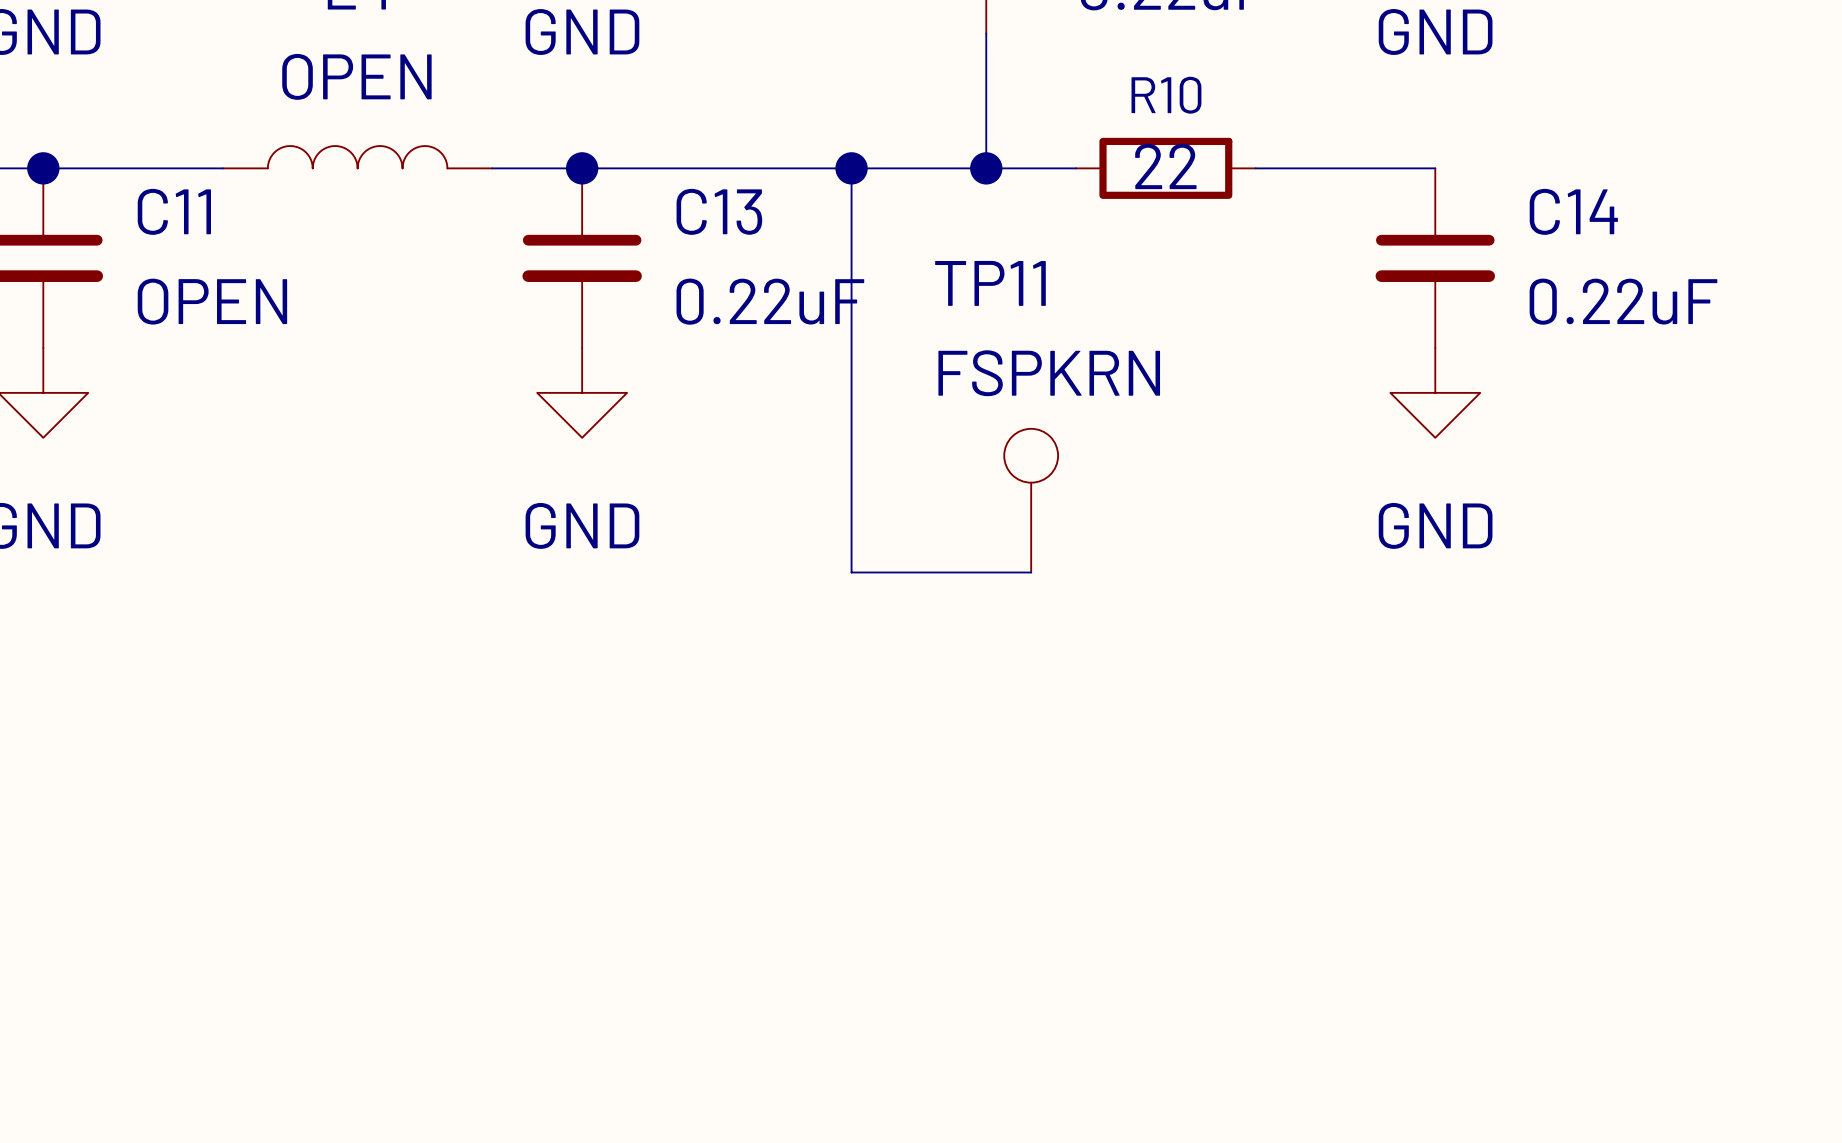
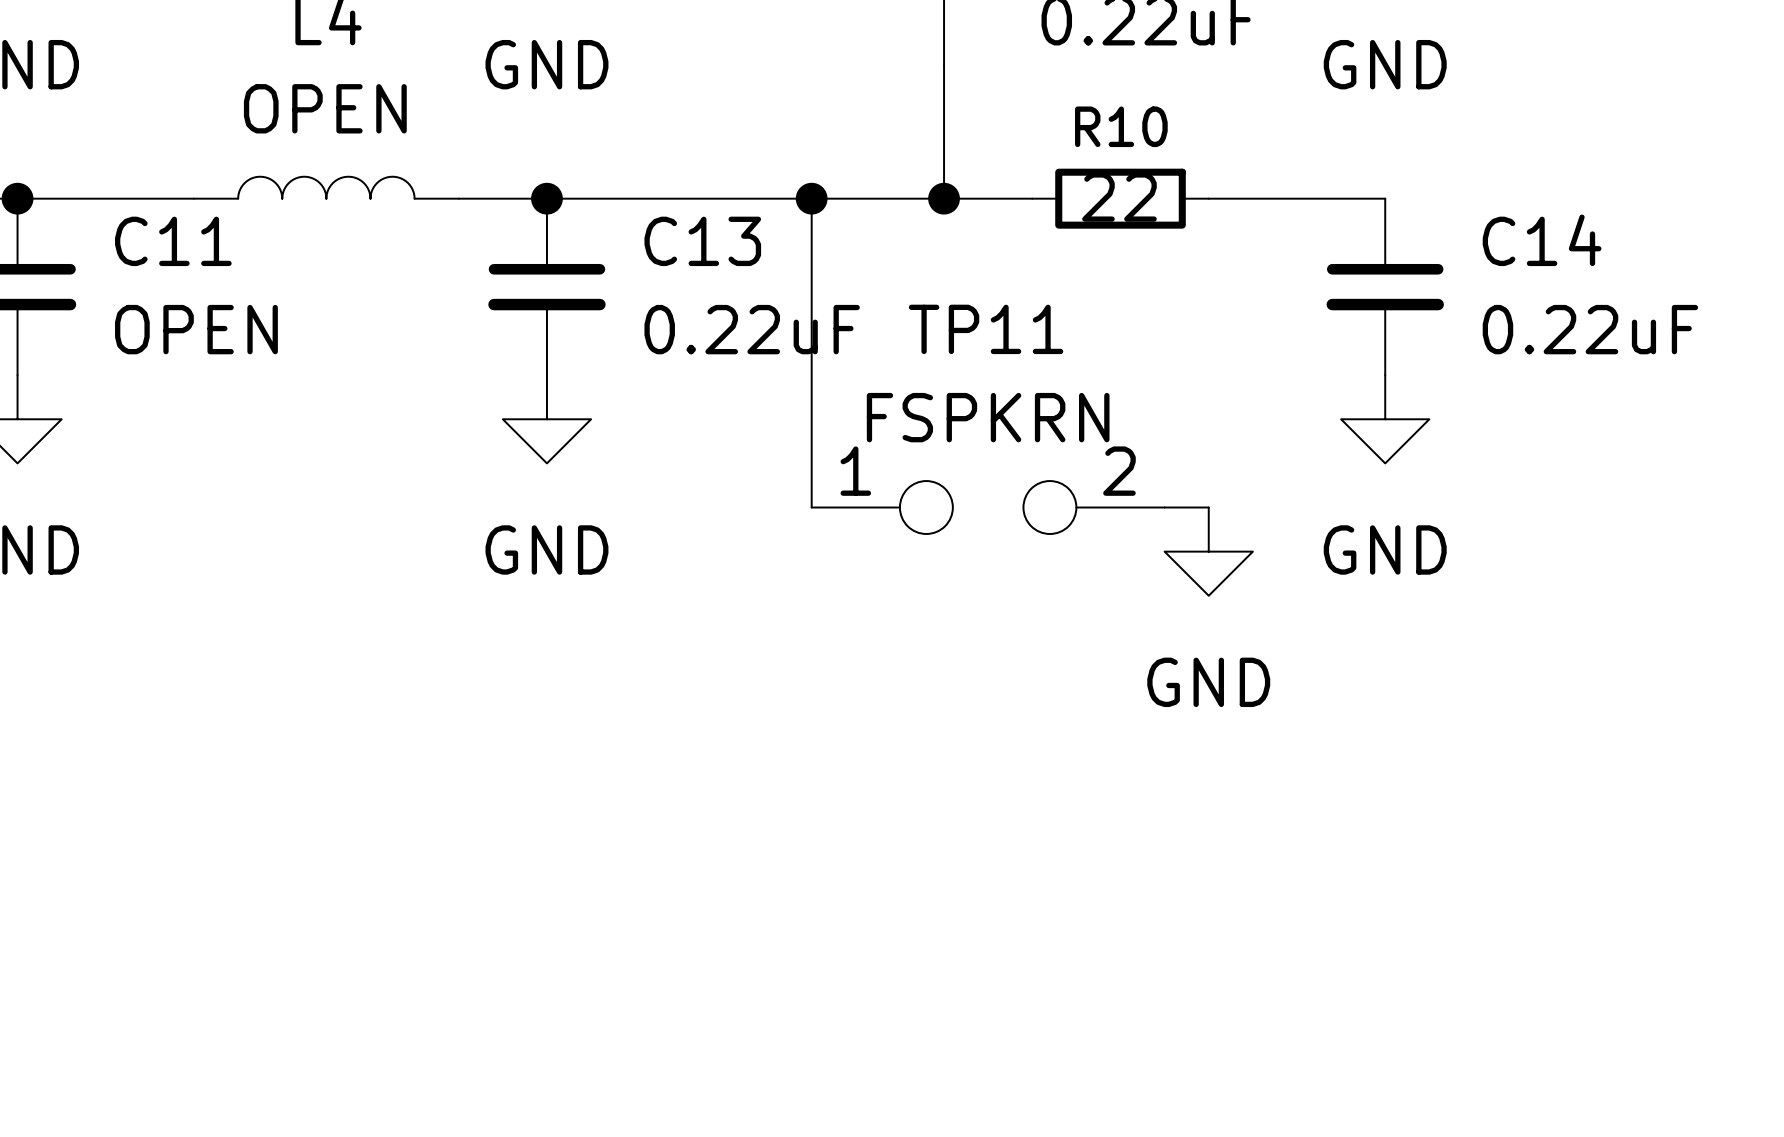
TP11 symbol: [1004, 428, 1059, 573] -> [811, 481, 1165, 534]
wire: (851, 482) (851, 572) (1031, 572) -> none
wire: none -> (1164, 507) (1208, 507)
power symbol: none -> GND (1208, 551)

